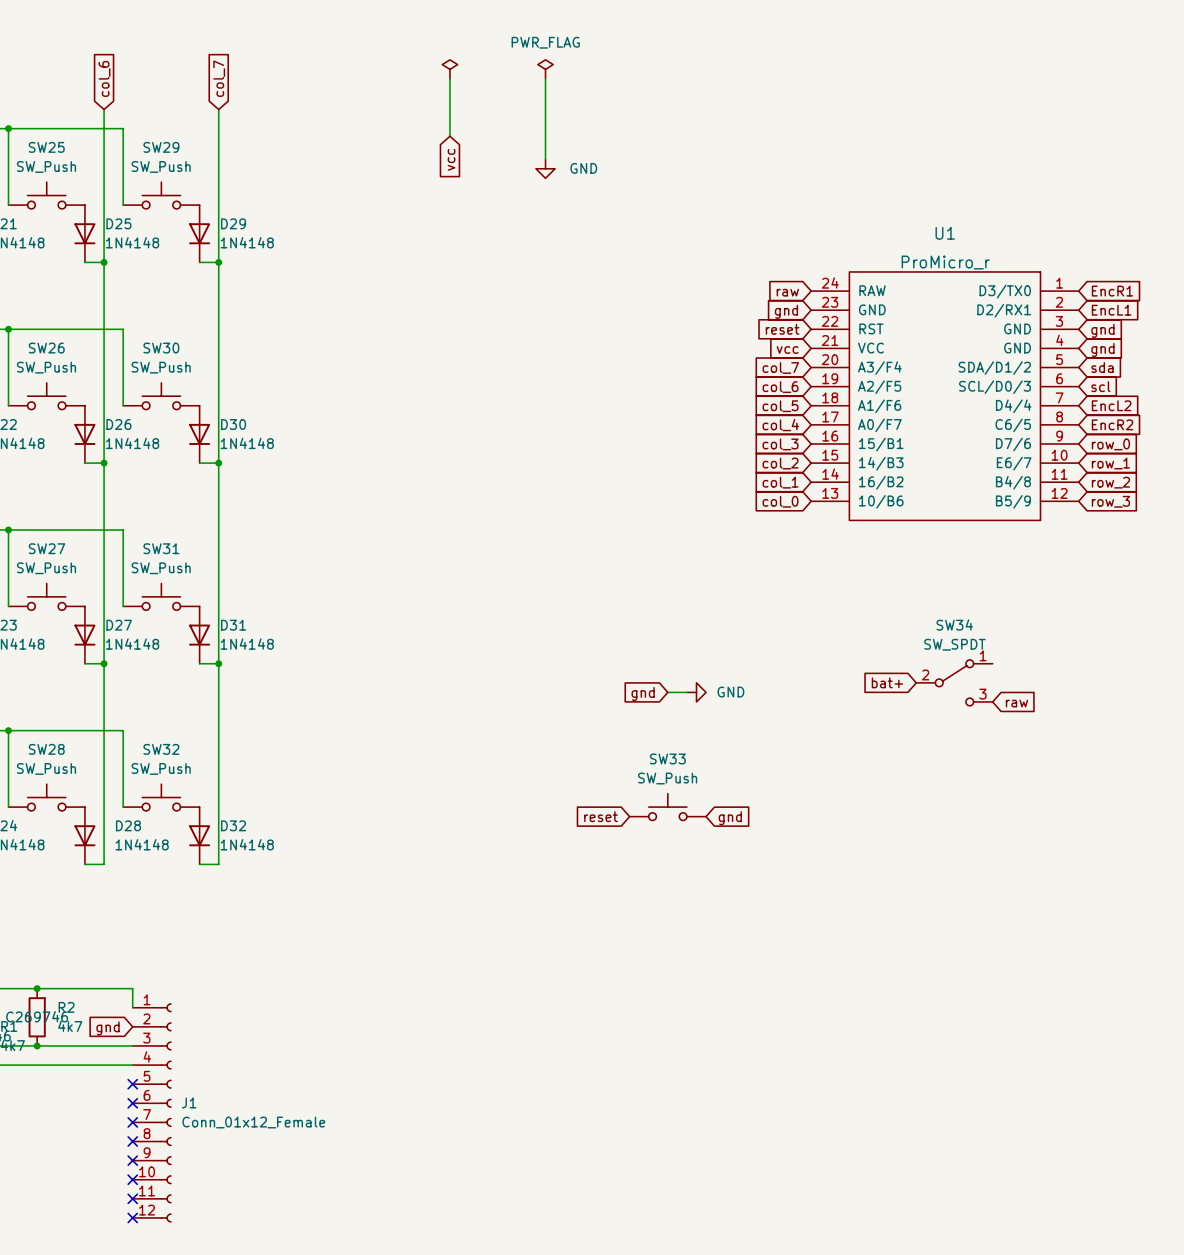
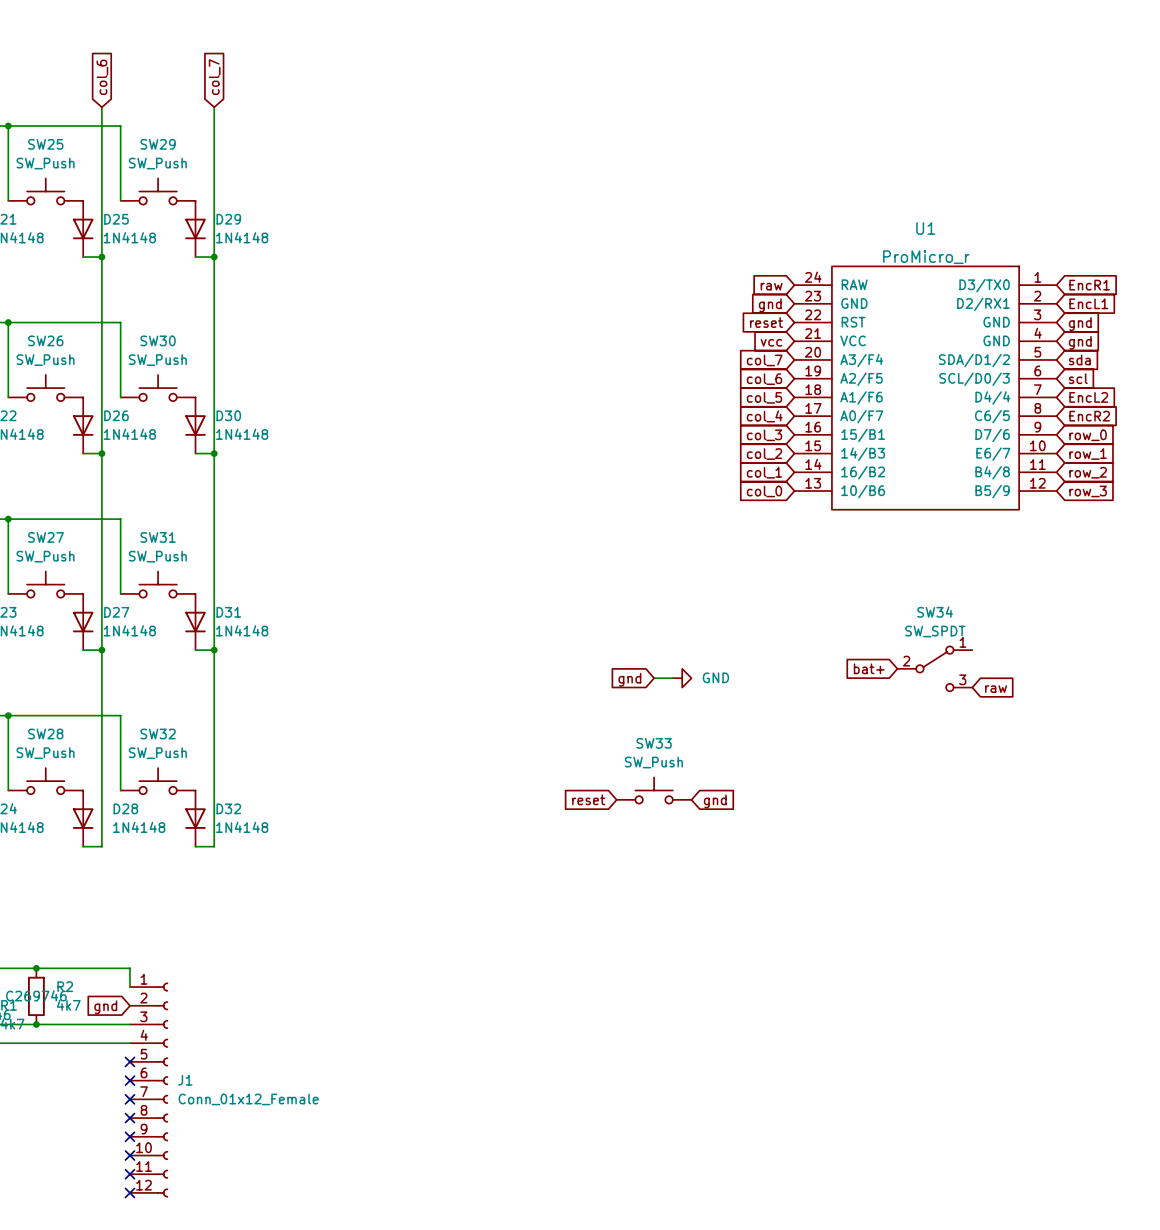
power symbol: (449, 69) -> none
power symbol: PWR_FLAG (545, 69) -> none
wire: (449, 78) (449, 136) -> none
wire: (545, 78) (545, 159) -> none
global label: vcc (451, 159) -> none
power symbol: GND (545, 168) -> none

